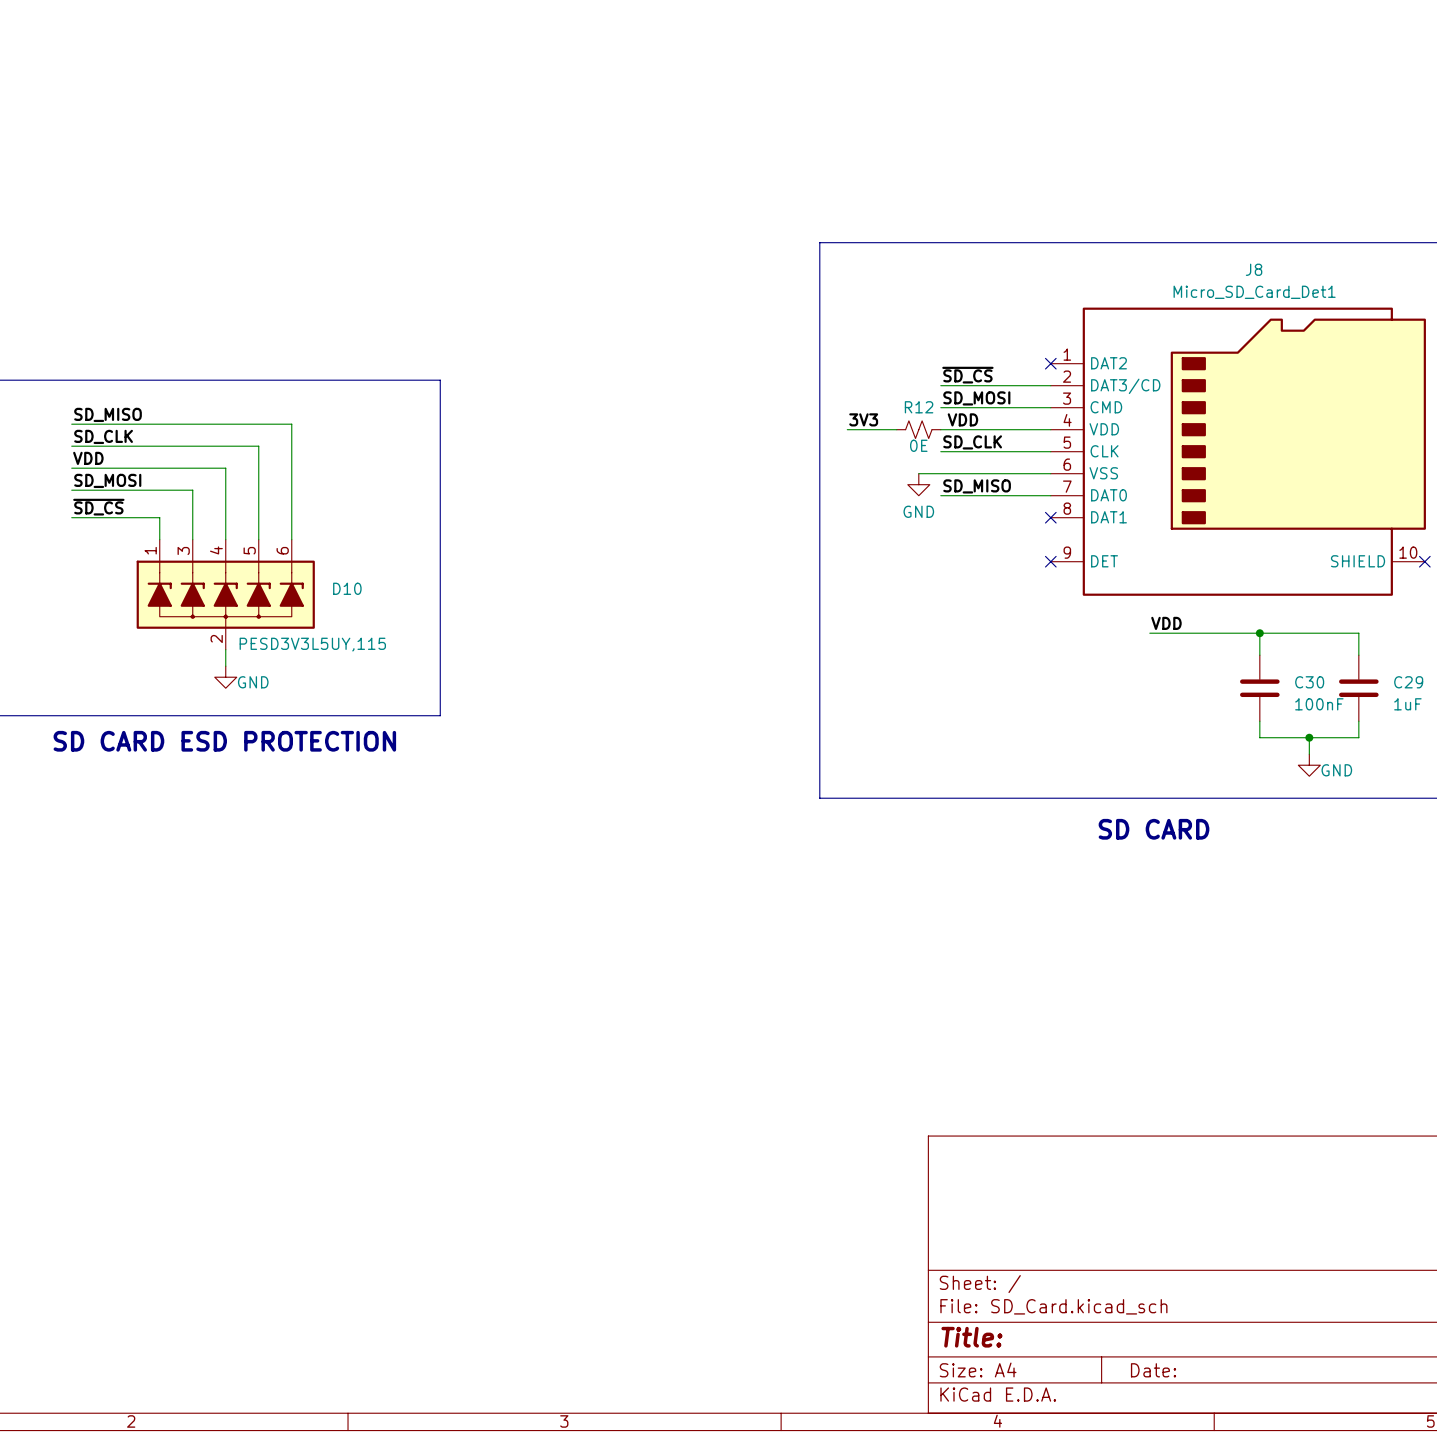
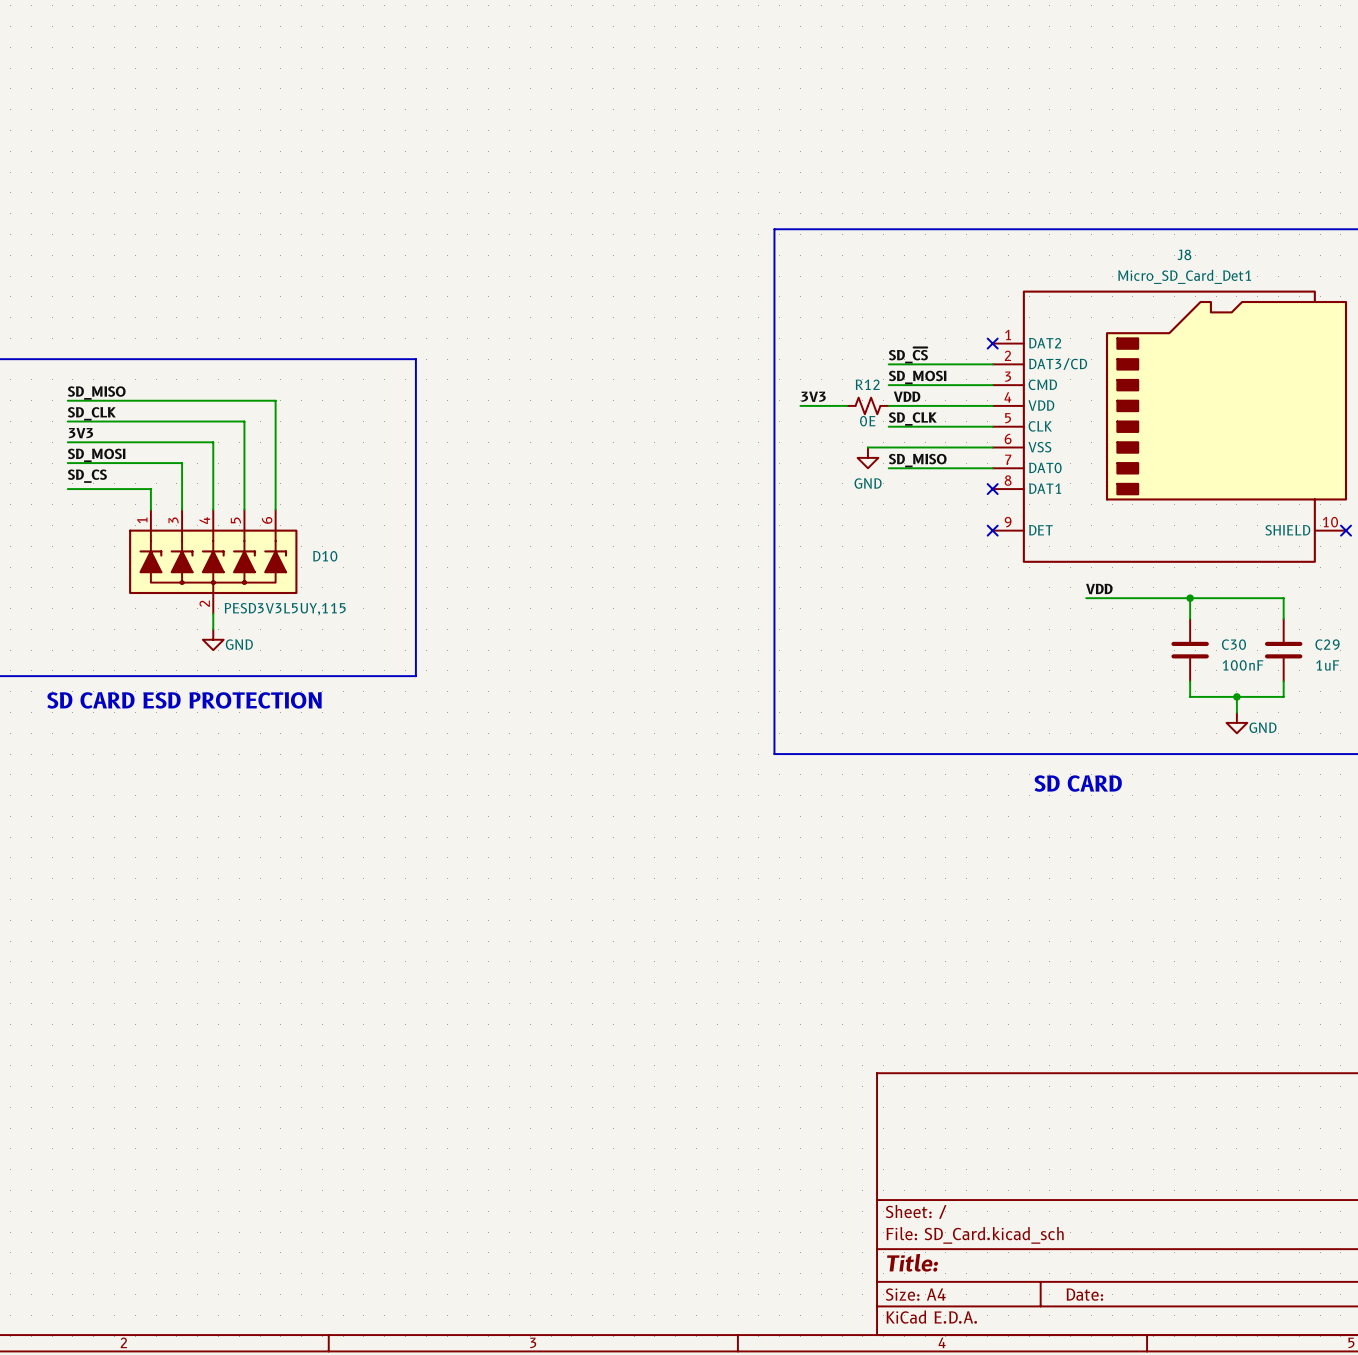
label: ~{SD_CS} (967, 375) -> SD_~{CS} (908, 355)
label: VDD (88, 458) -> 3V3 (80, 433)
label: ~{SD_CS} (98, 507) -> SD_CS (87, 476)

